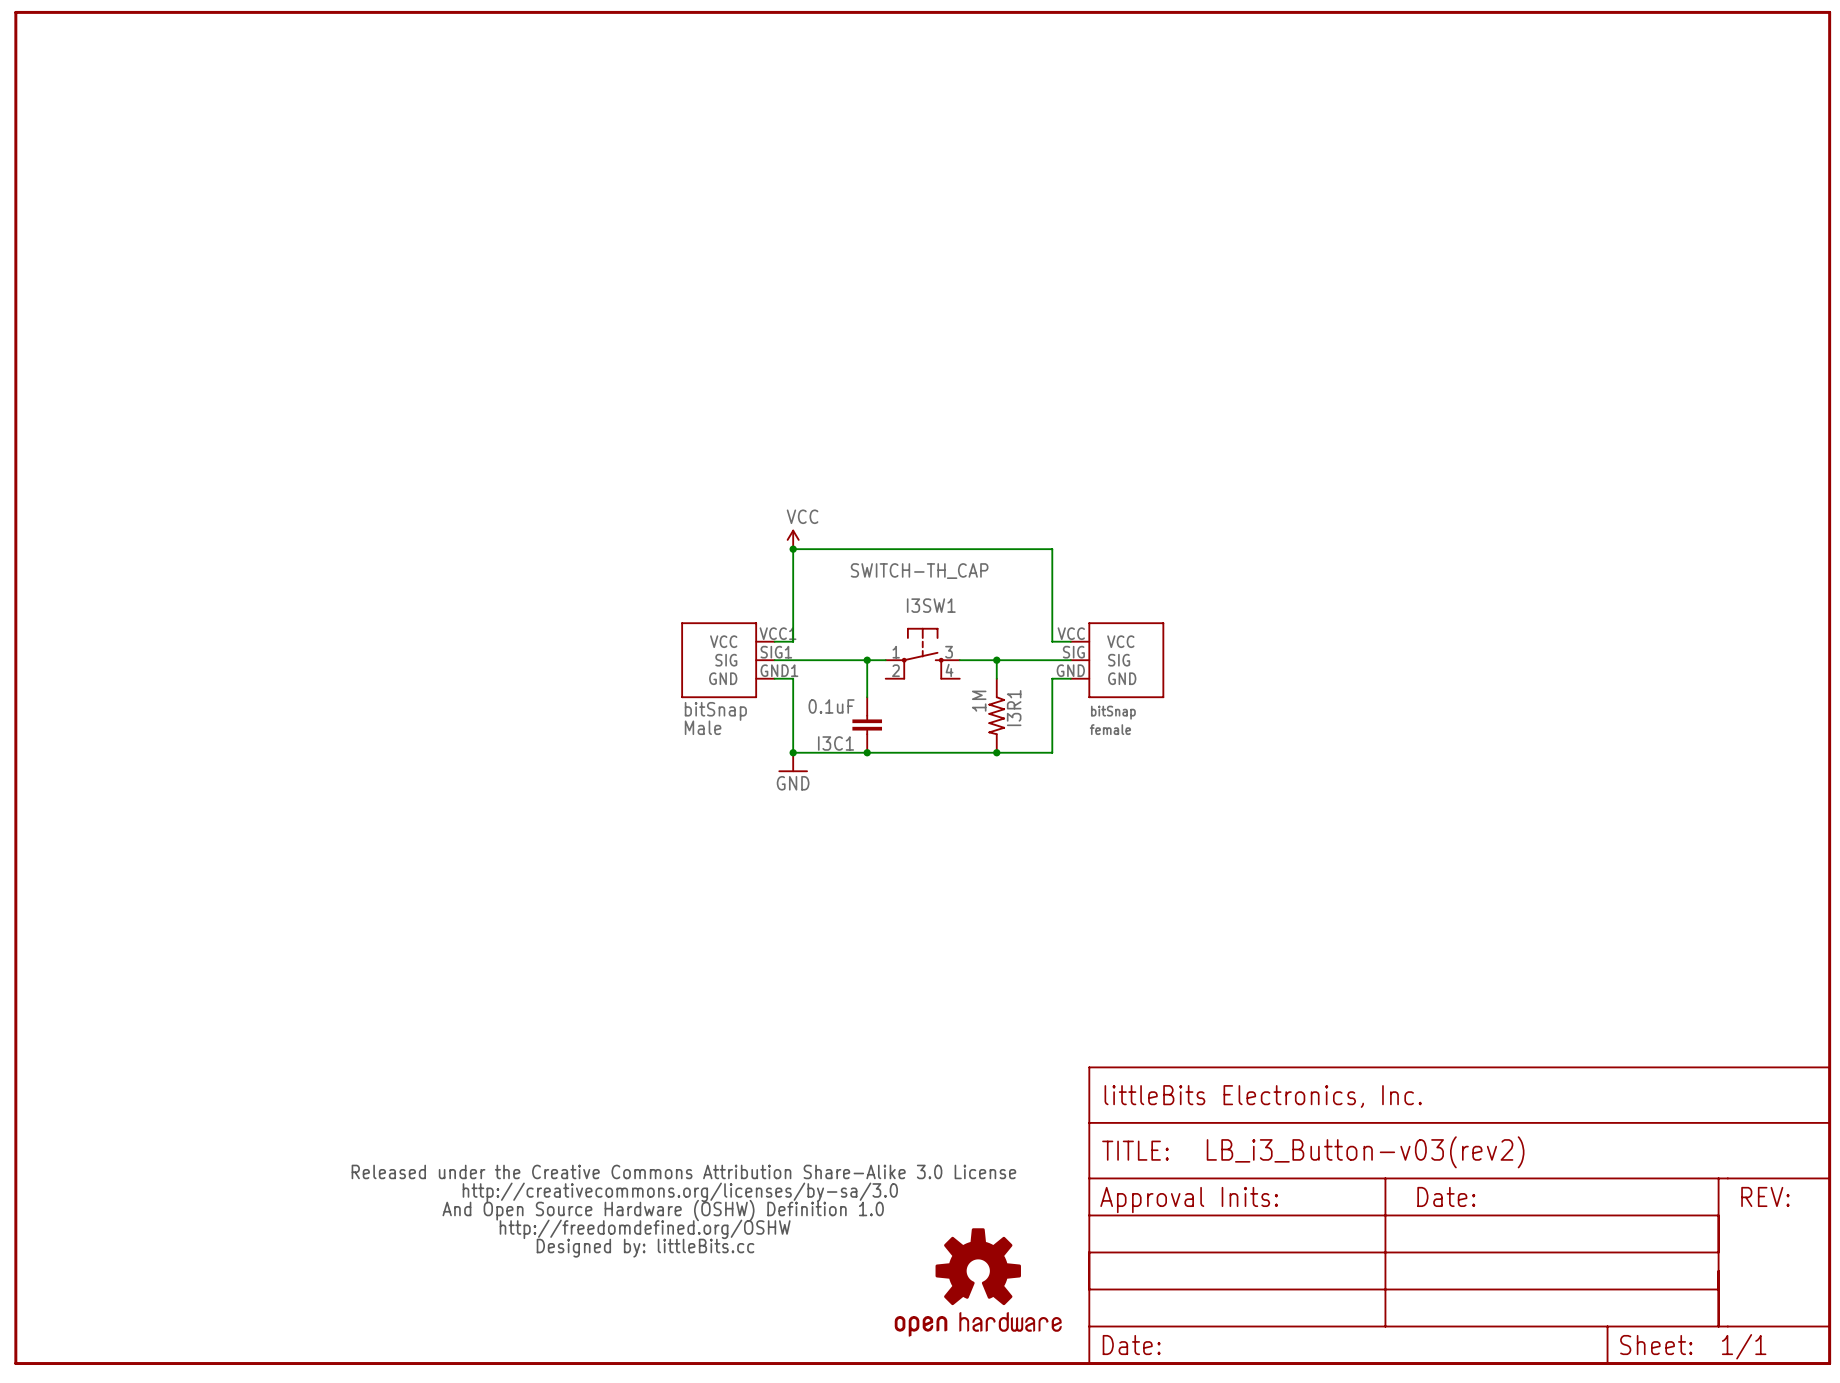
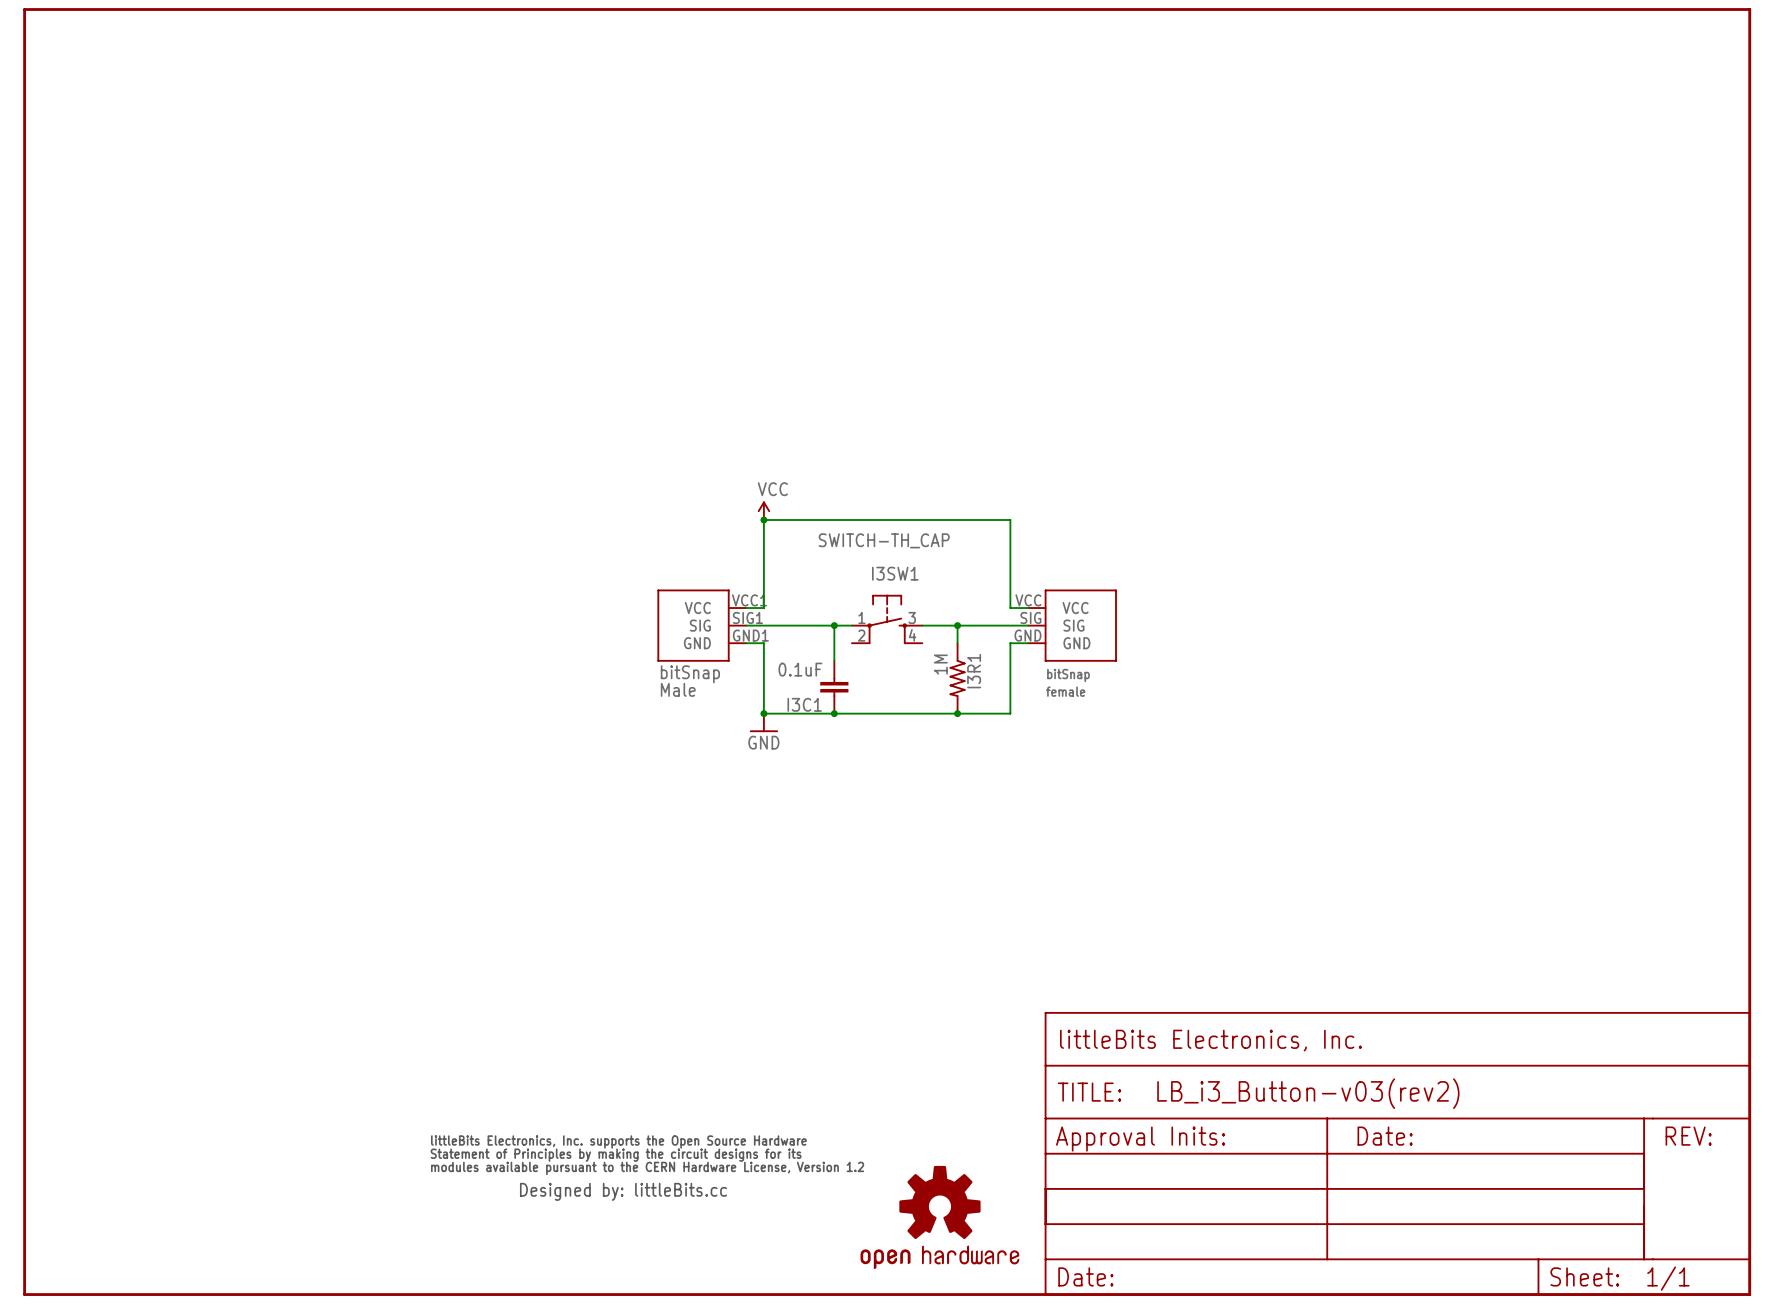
part: (683, 1211) -> none
part: none -> (647, 1168)

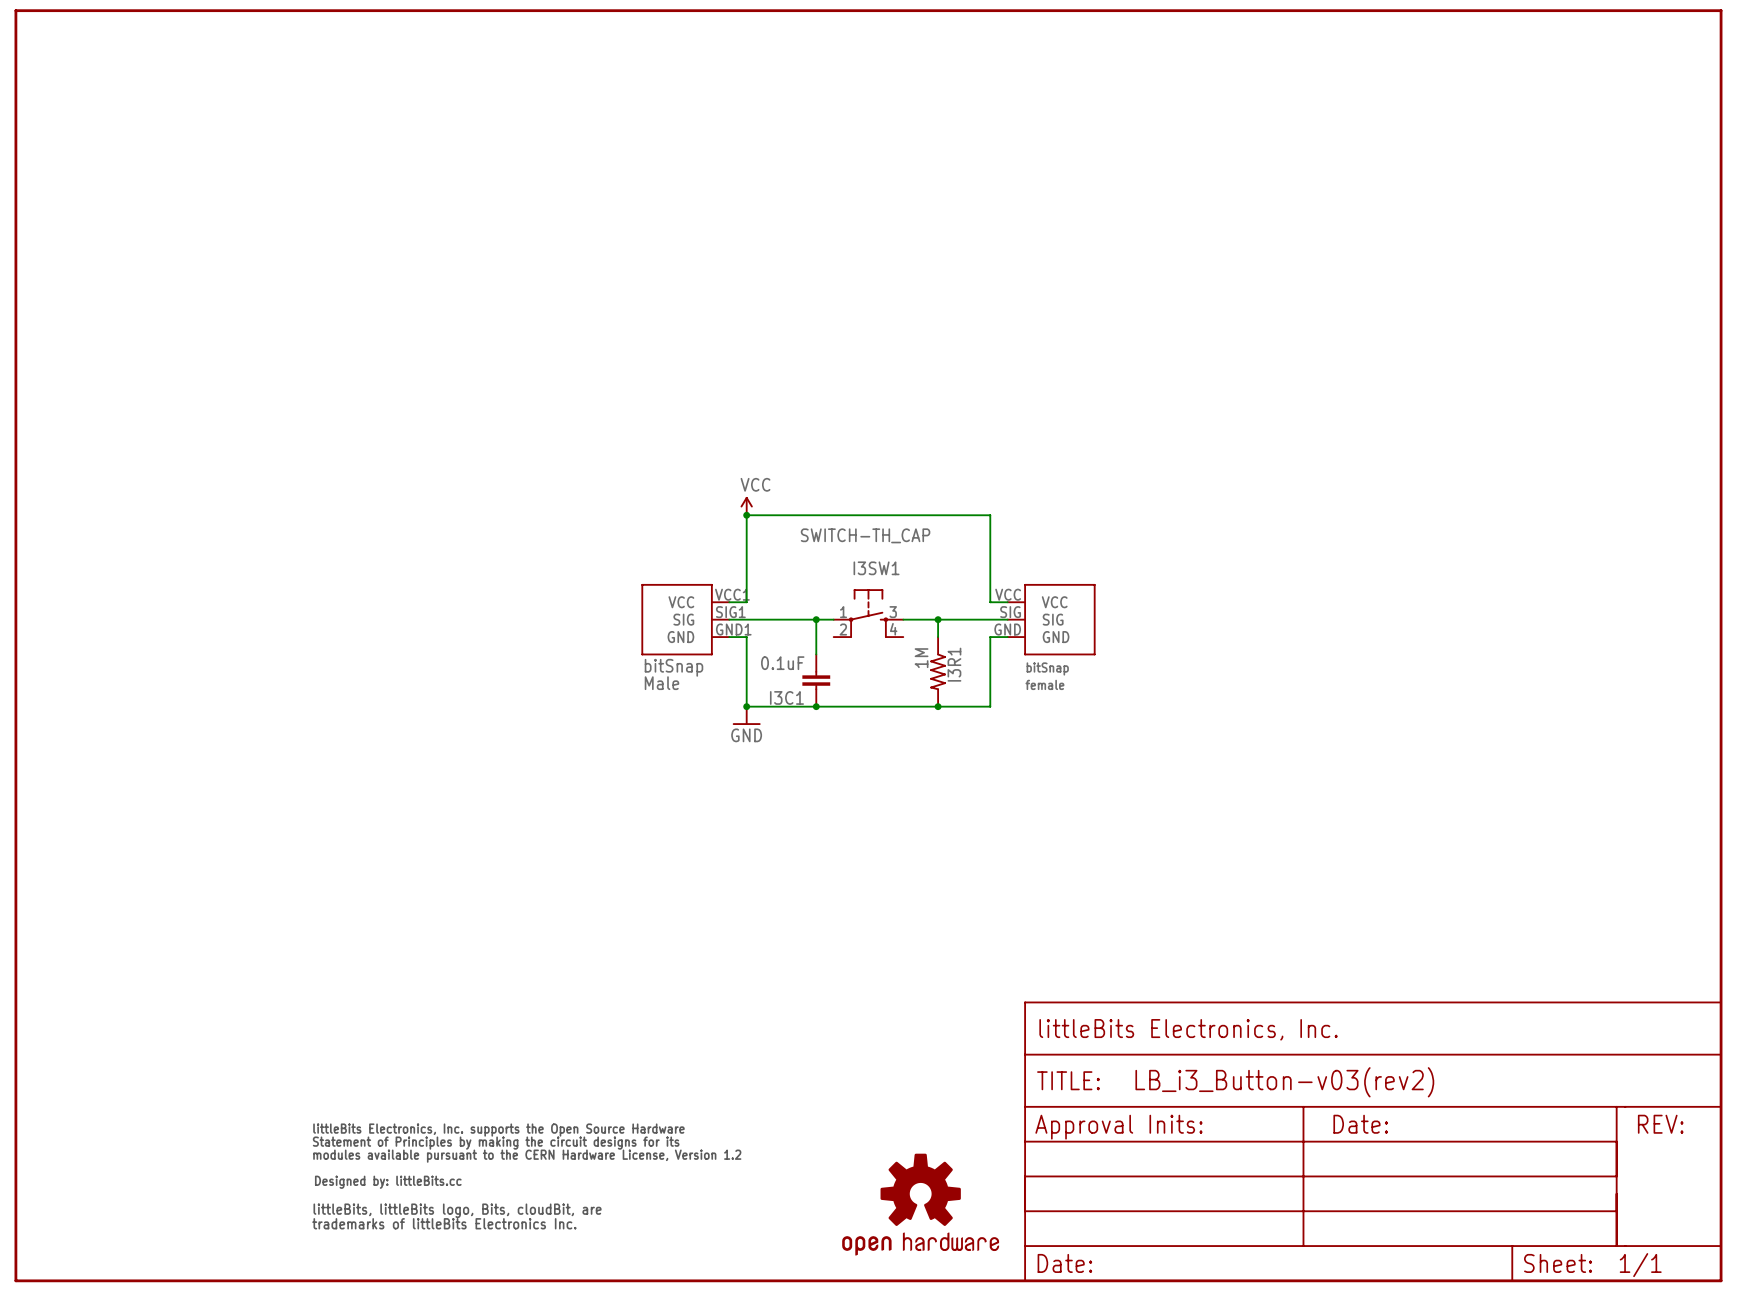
part: (647, 1168) -> none
part: none -> (526, 1176)

